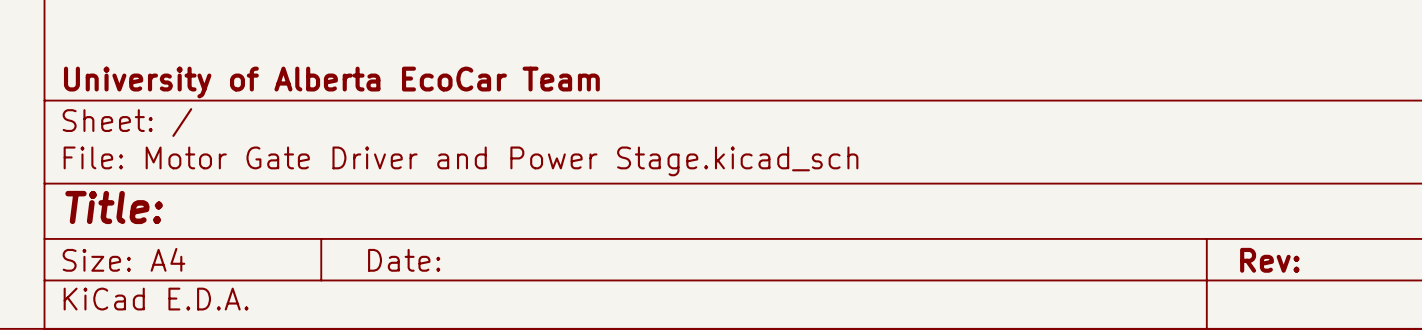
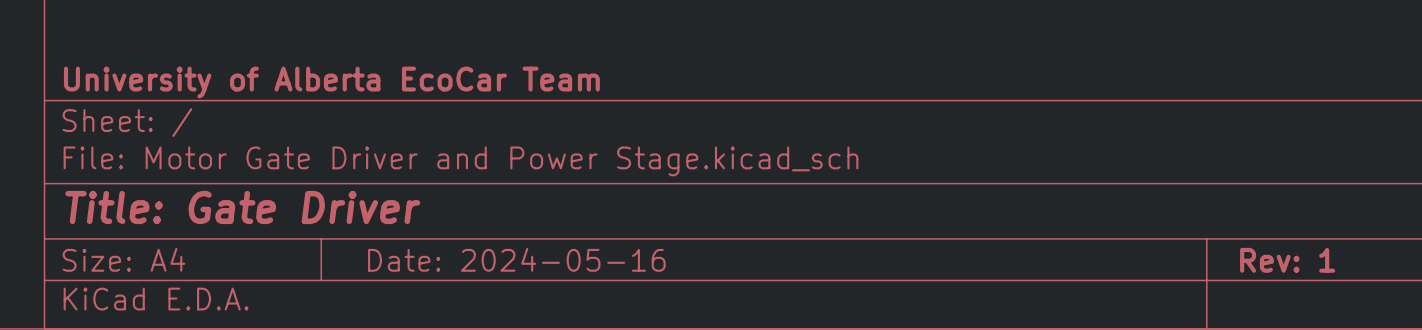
title block: Title: (114, 207) -> Title: Gate Driver (242, 207)
title block: Date: (404, 260) -> Date: 2024-05-16 (516, 259)
title block: Rev: (1269, 260) -> Rev: 1 (1287, 260)

